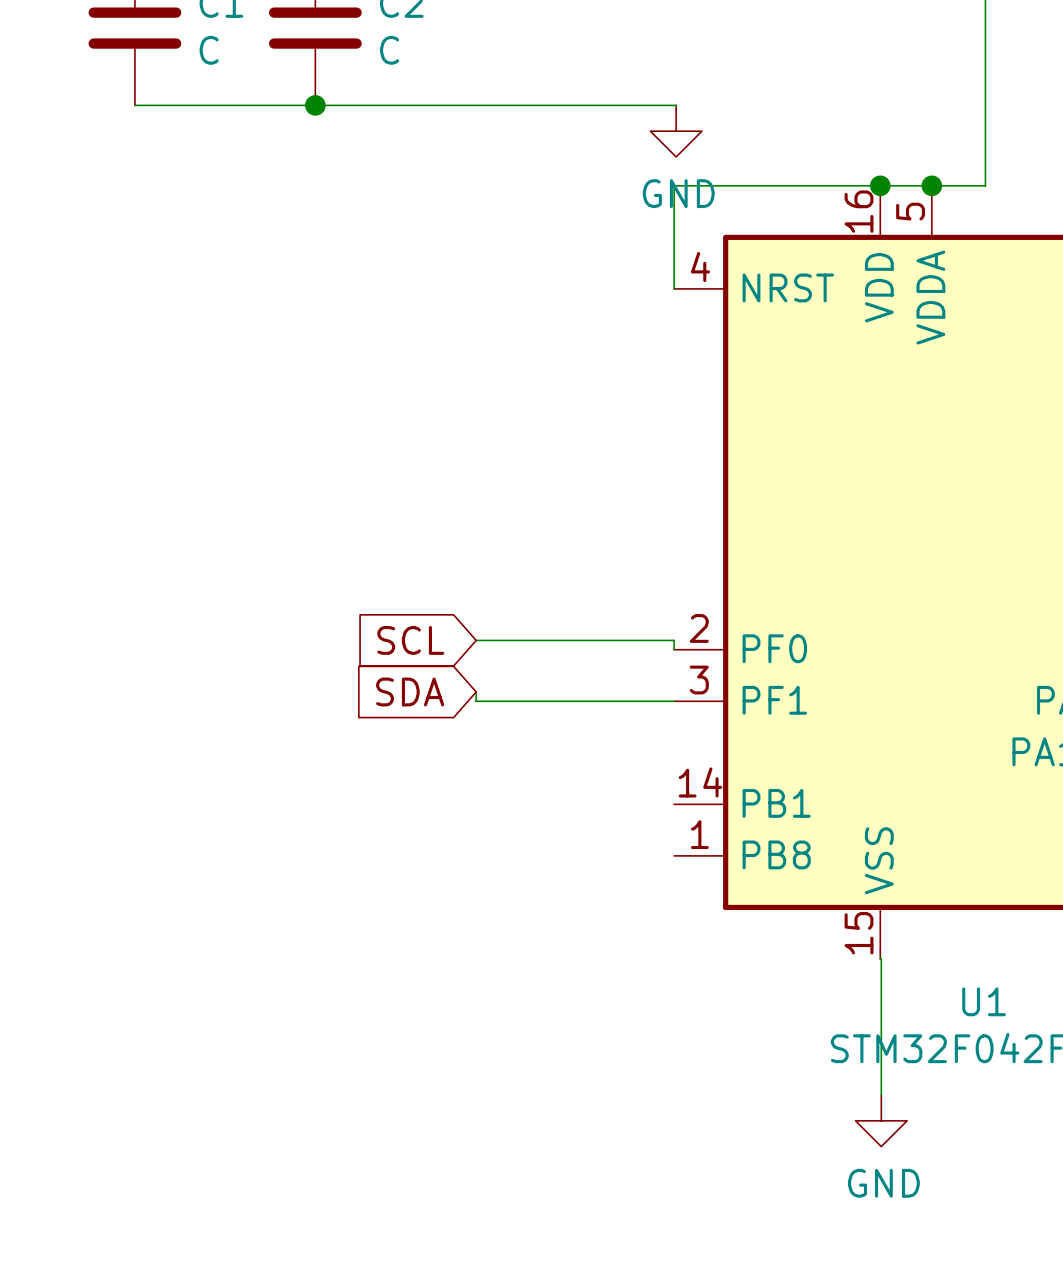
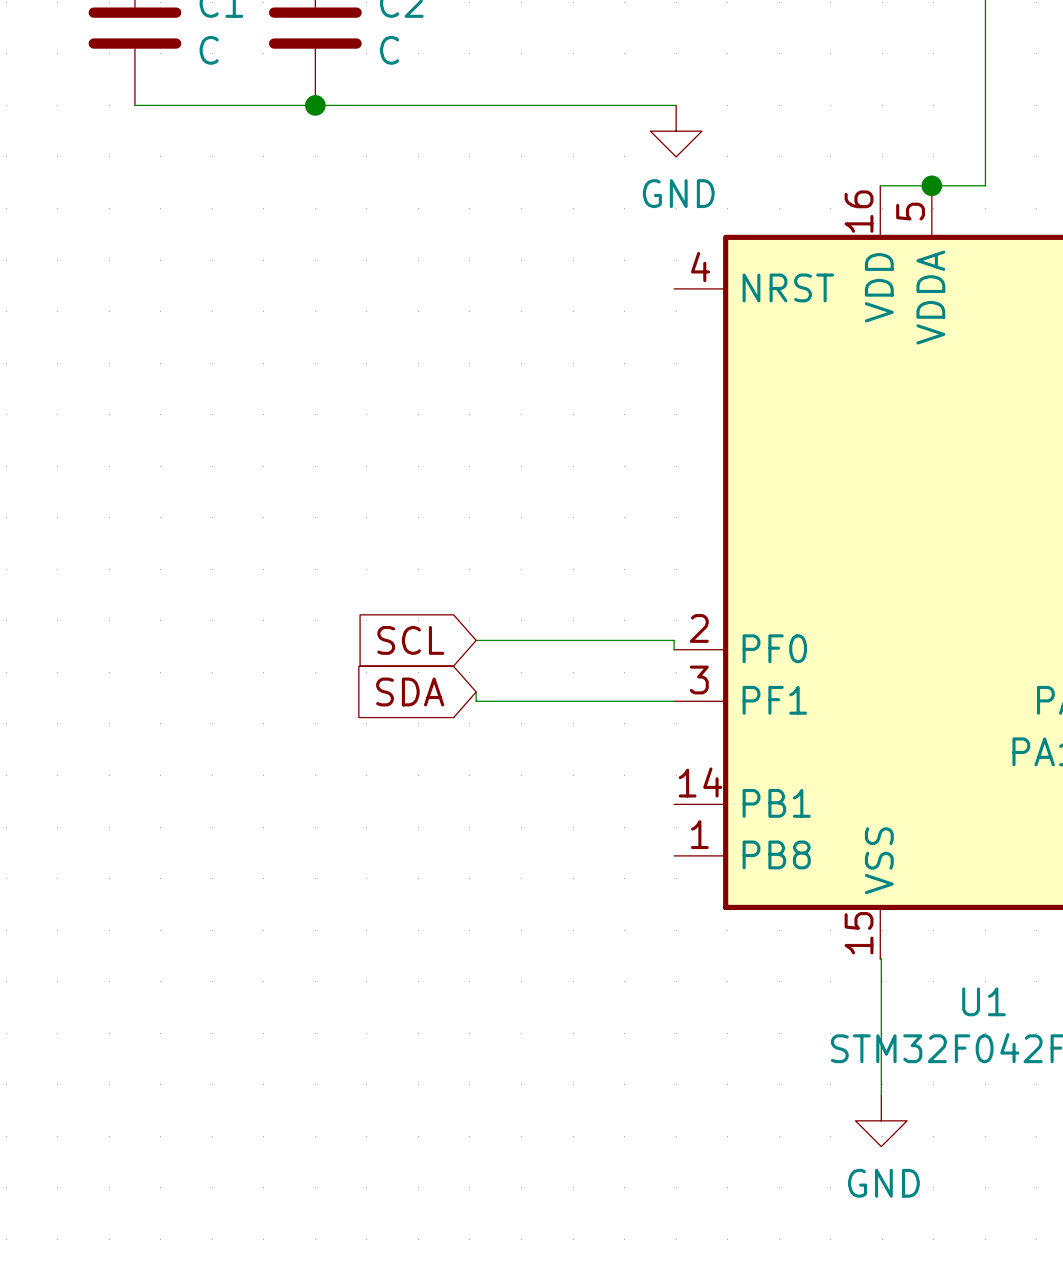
wire: (880, 185) (674, 185) (674, 288) -> none
junction: (880, 185) -> none

